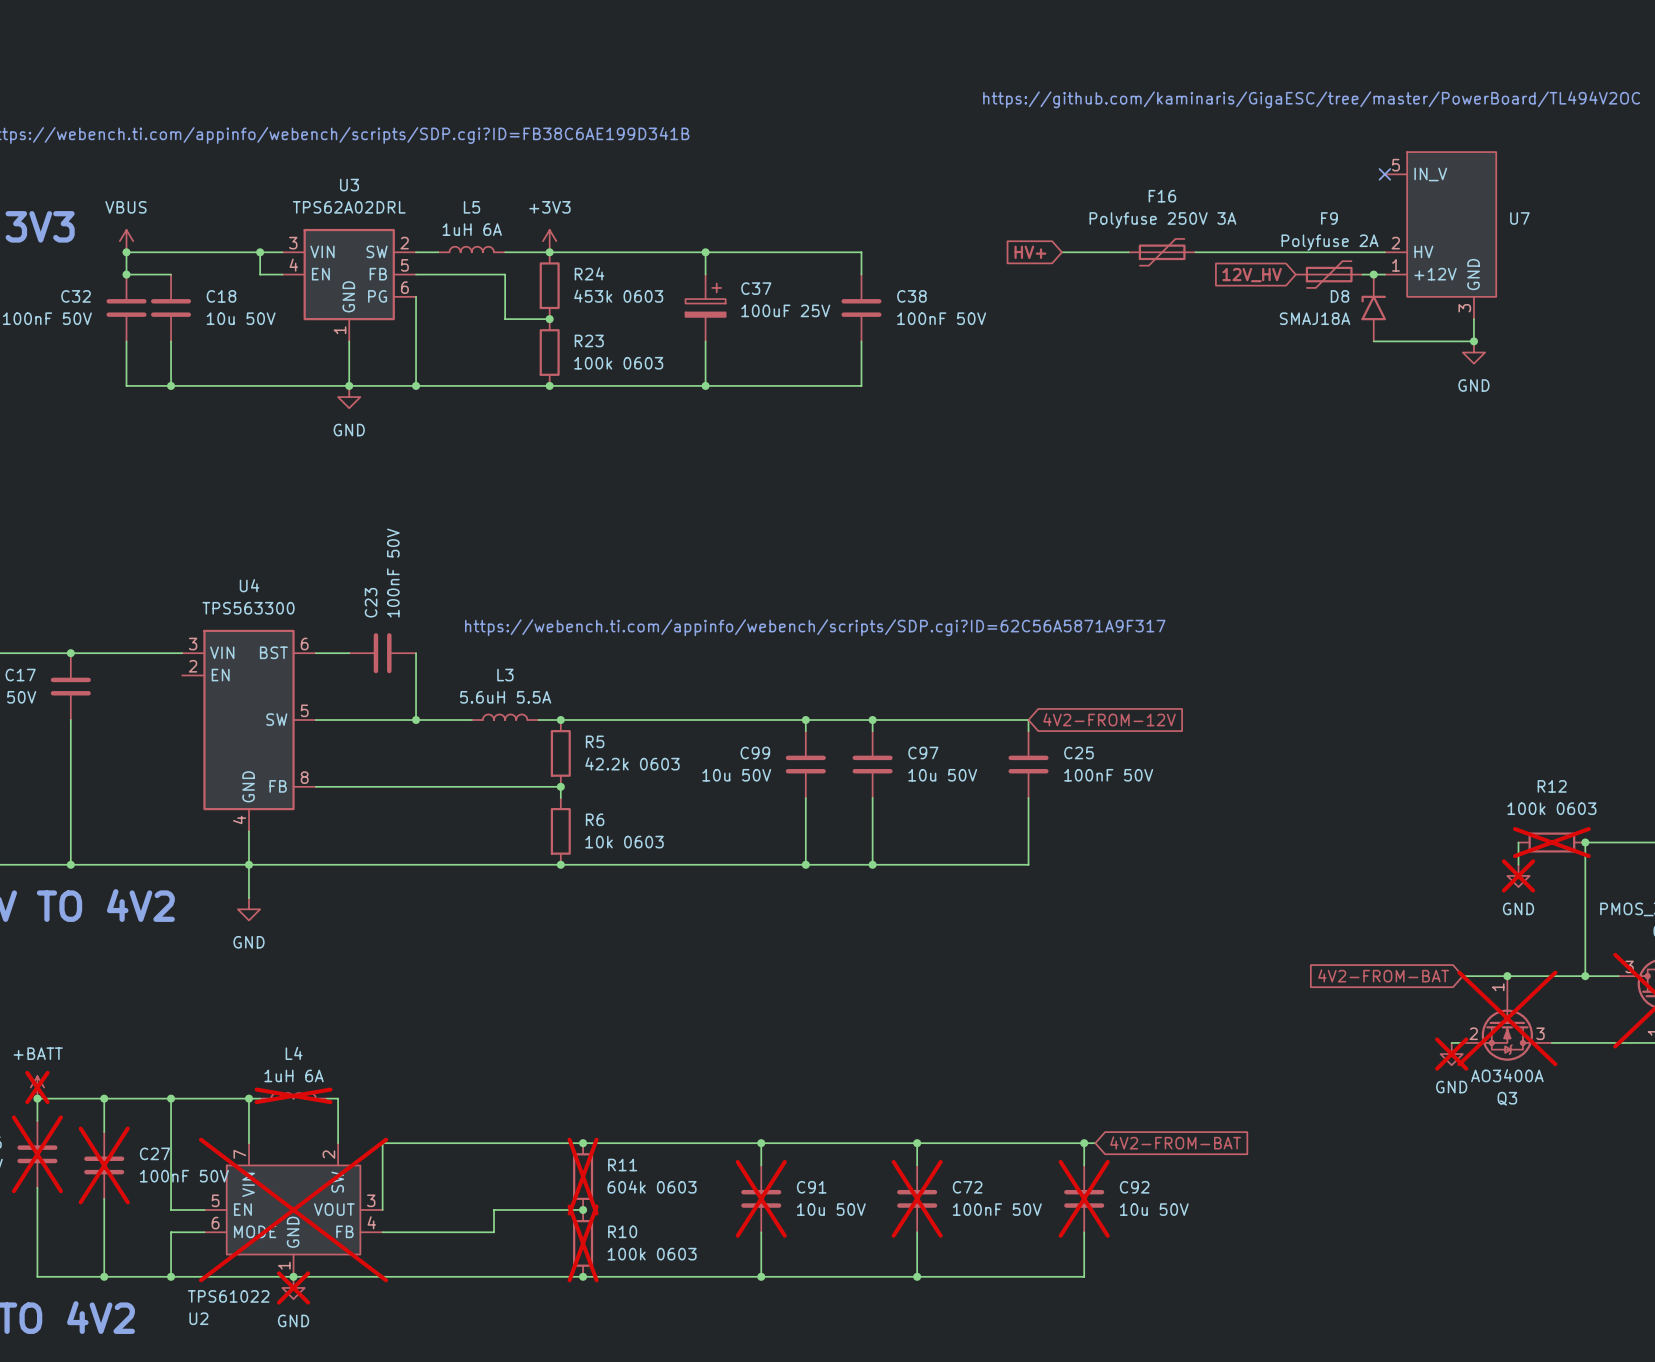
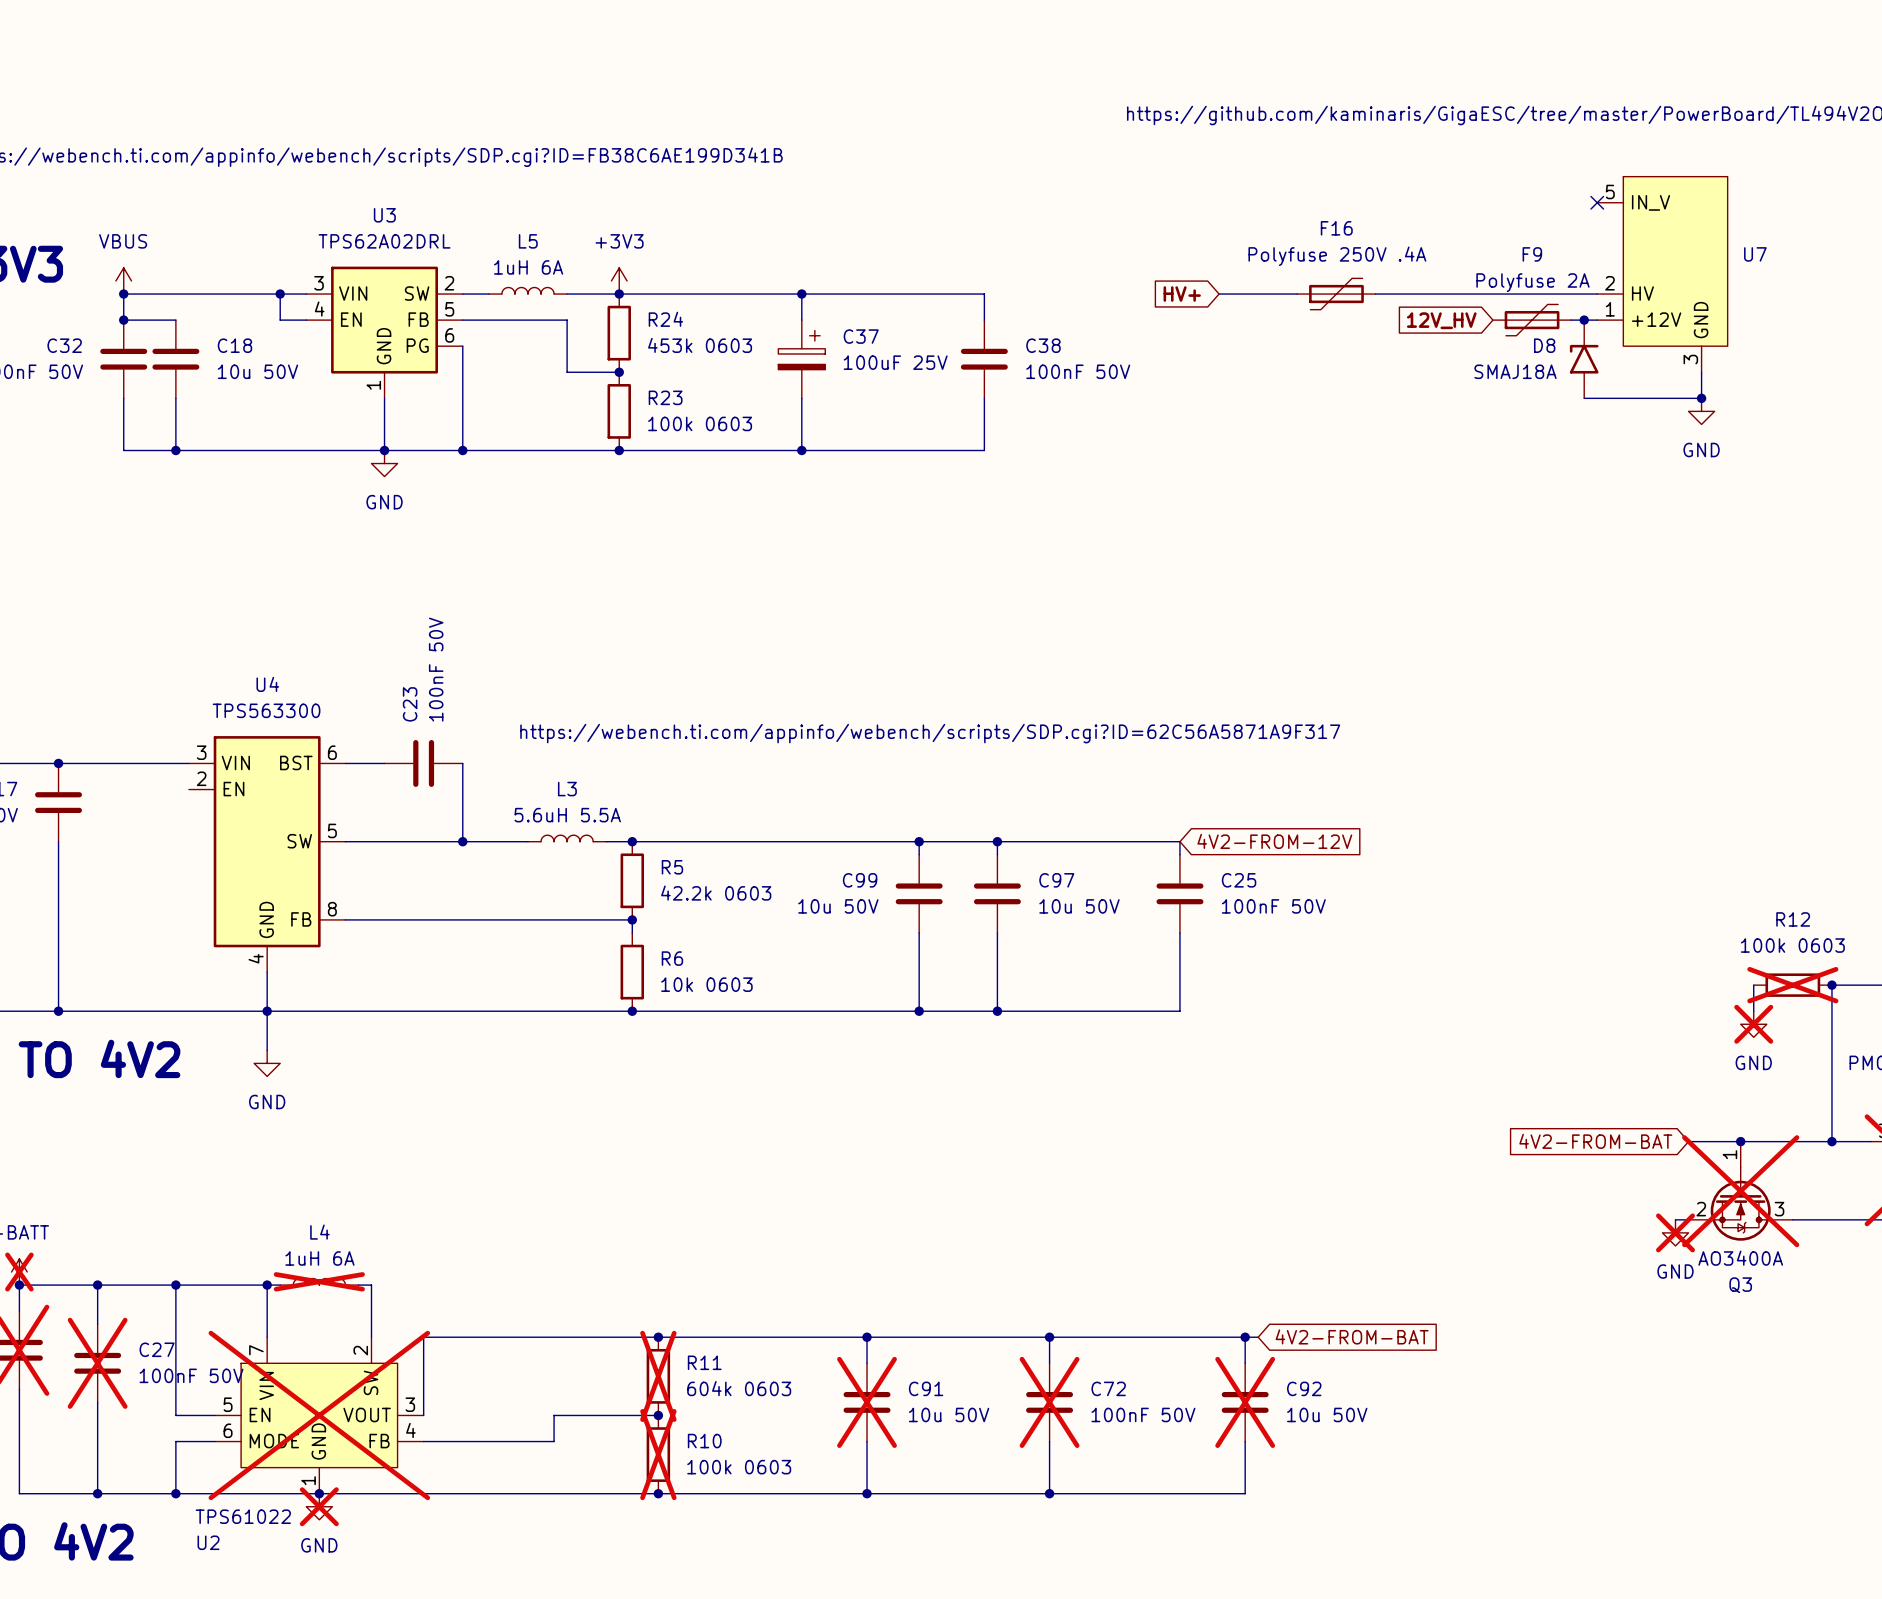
F16 value: Polyfuse 250V 3A (1162, 220) -> Polyfuse 250V .4A (1337, 256)

